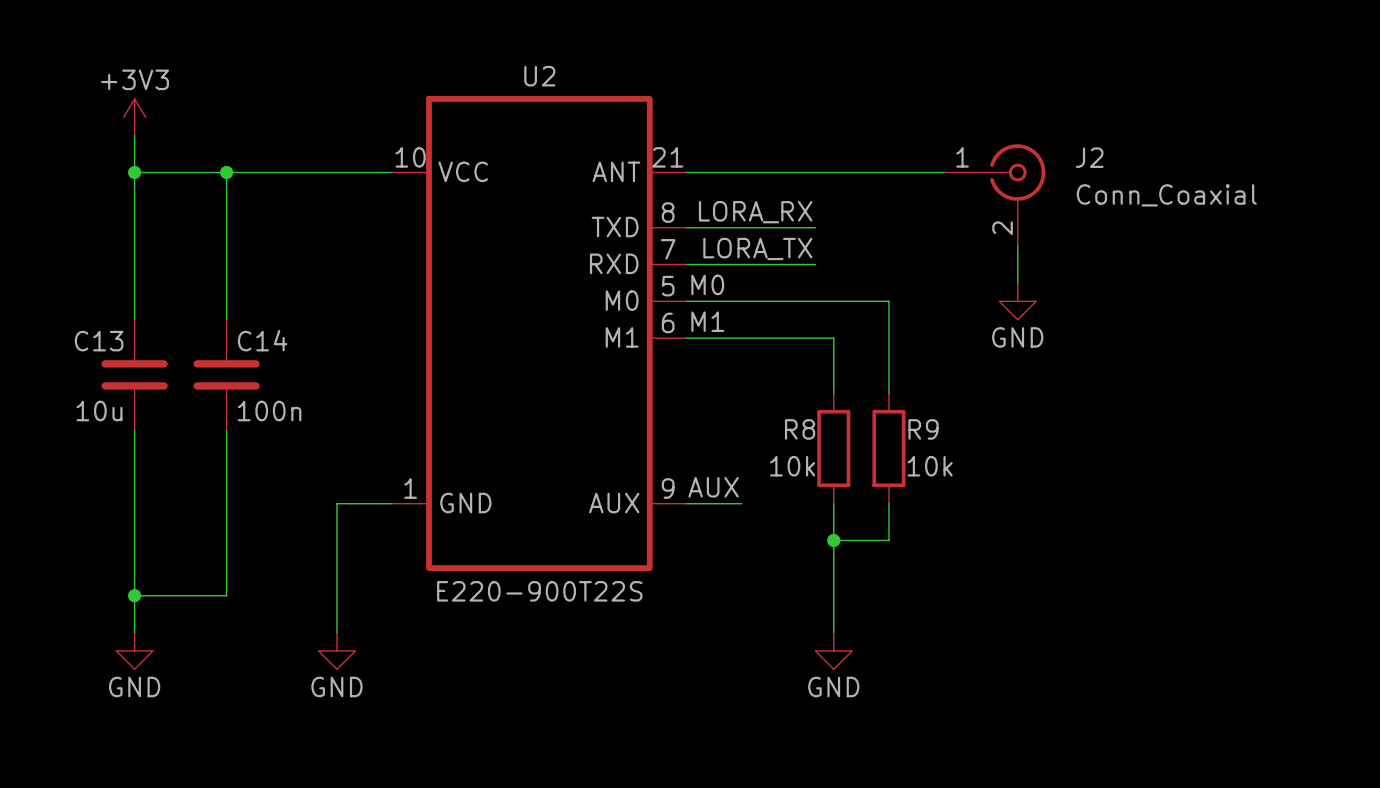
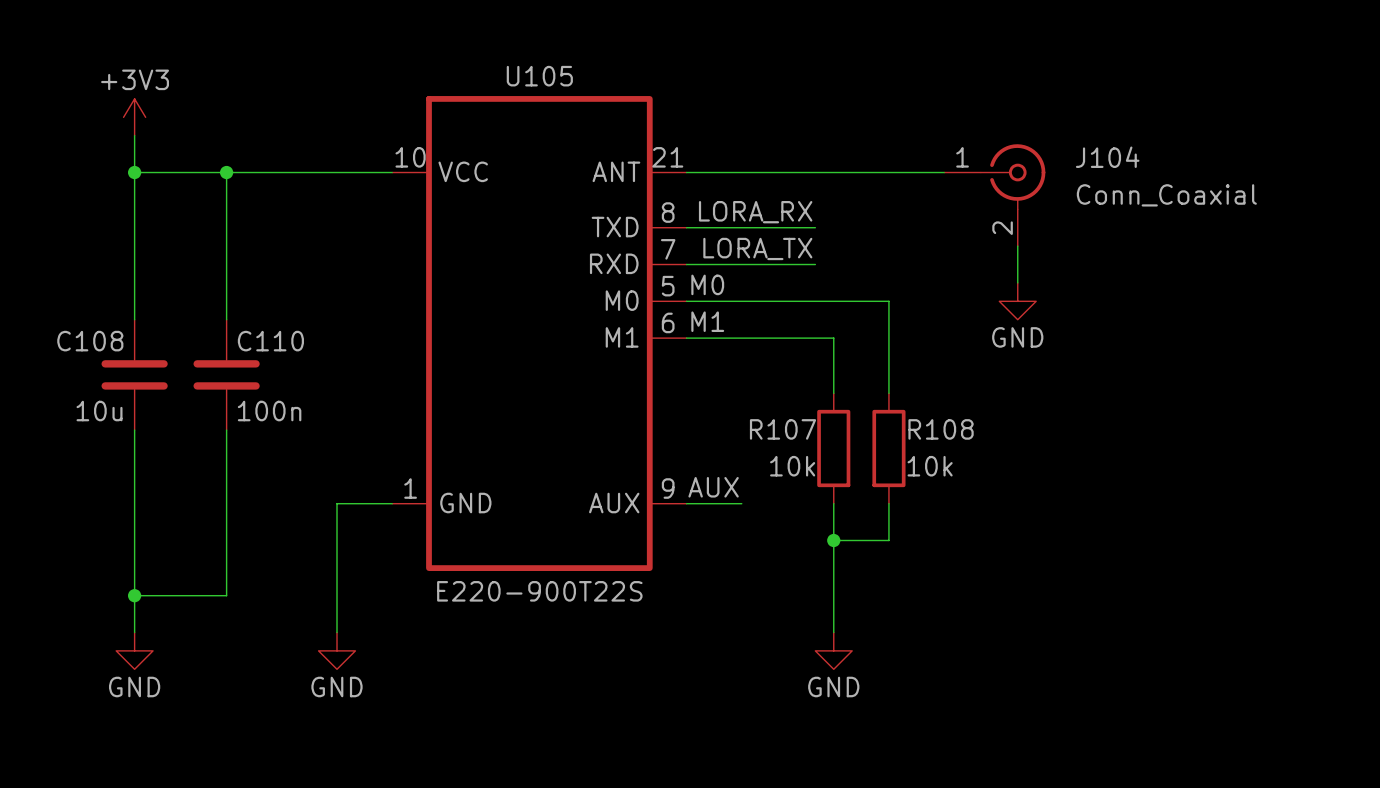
U2 name: U2 (539, 76) -> U105 (539, 76)
J2 name: J2 (1089, 157) -> J104 (1107, 157)
C14 name: C14 (262, 340) -> C110 (270, 341)
C13 name: C13 (99, 341) -> C108 (90, 341)
R8 name: R8 (800, 429) -> R107 (782, 429)
R9 name: R9 (923, 429) -> R108 (941, 429)

